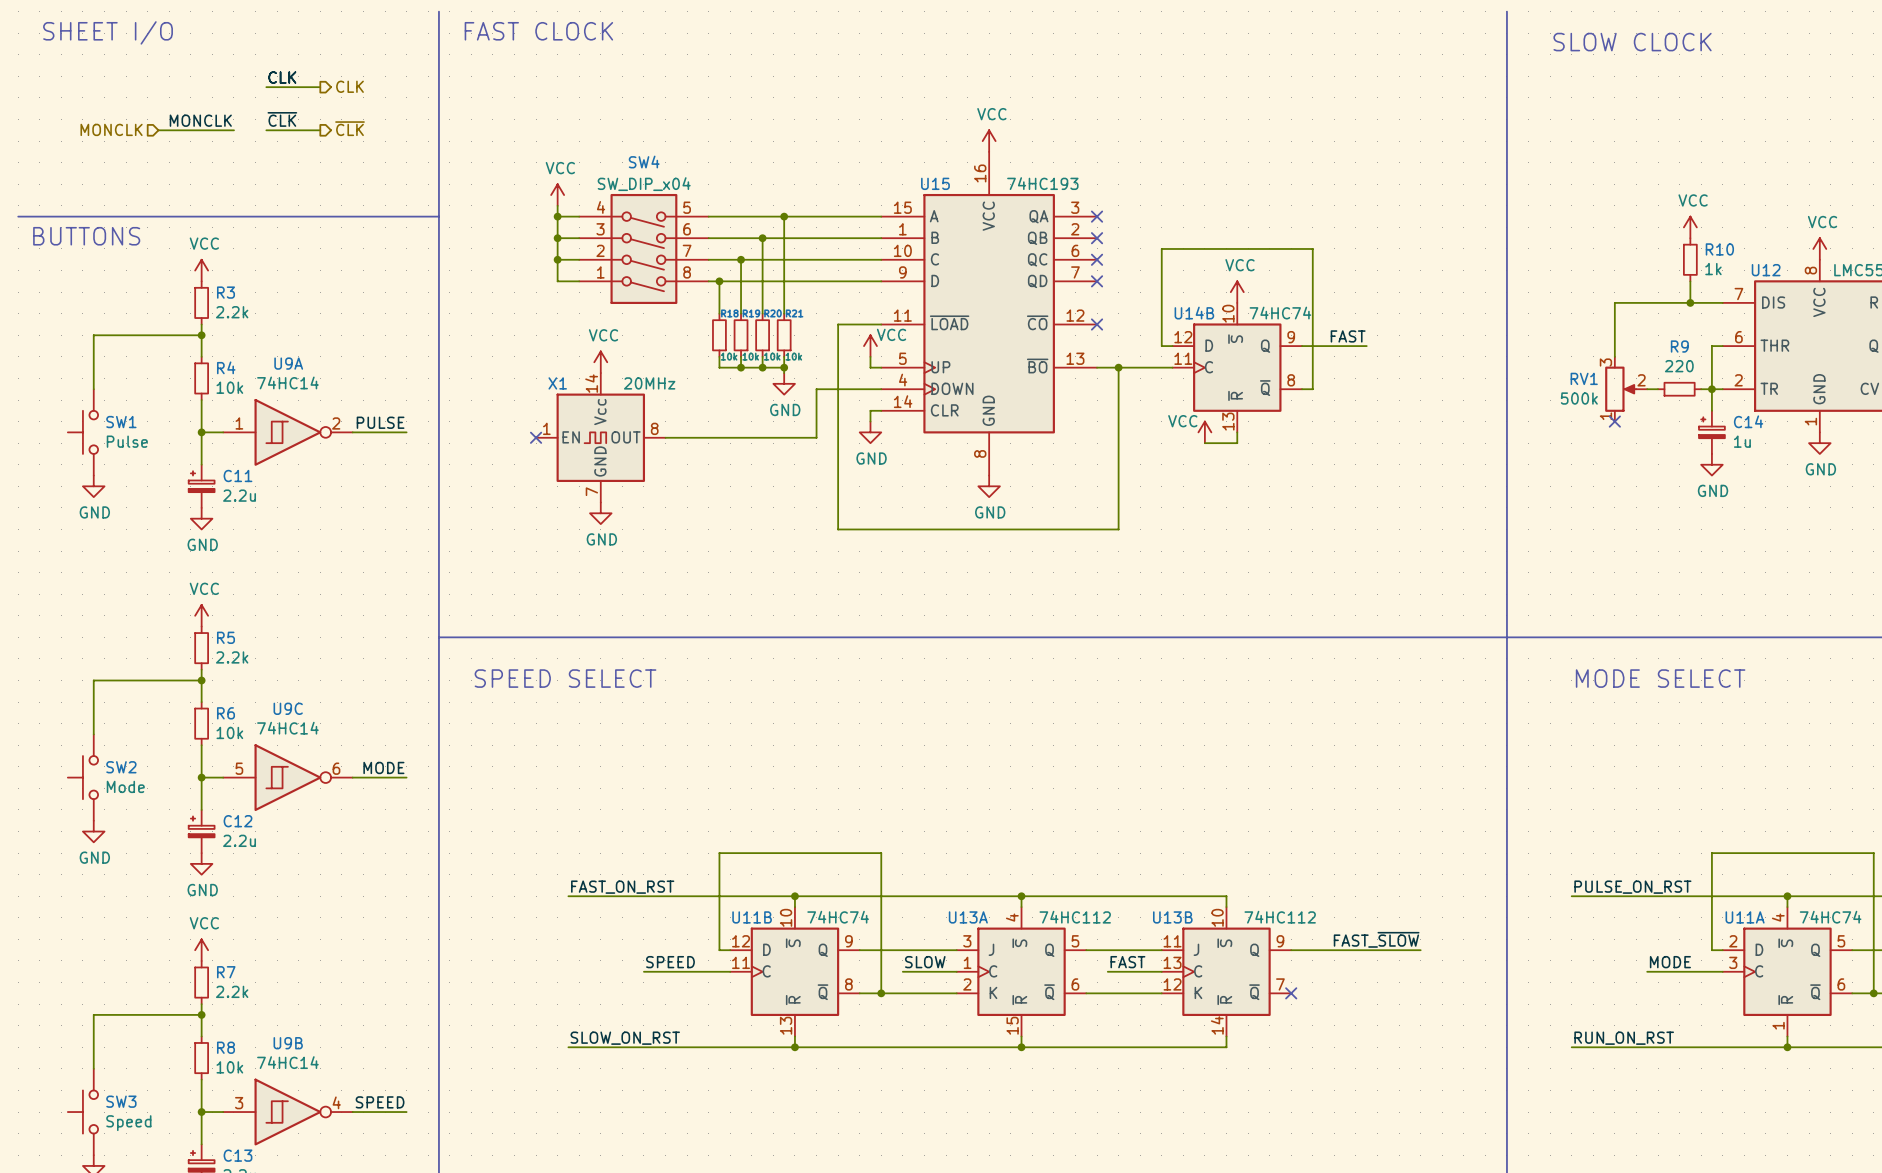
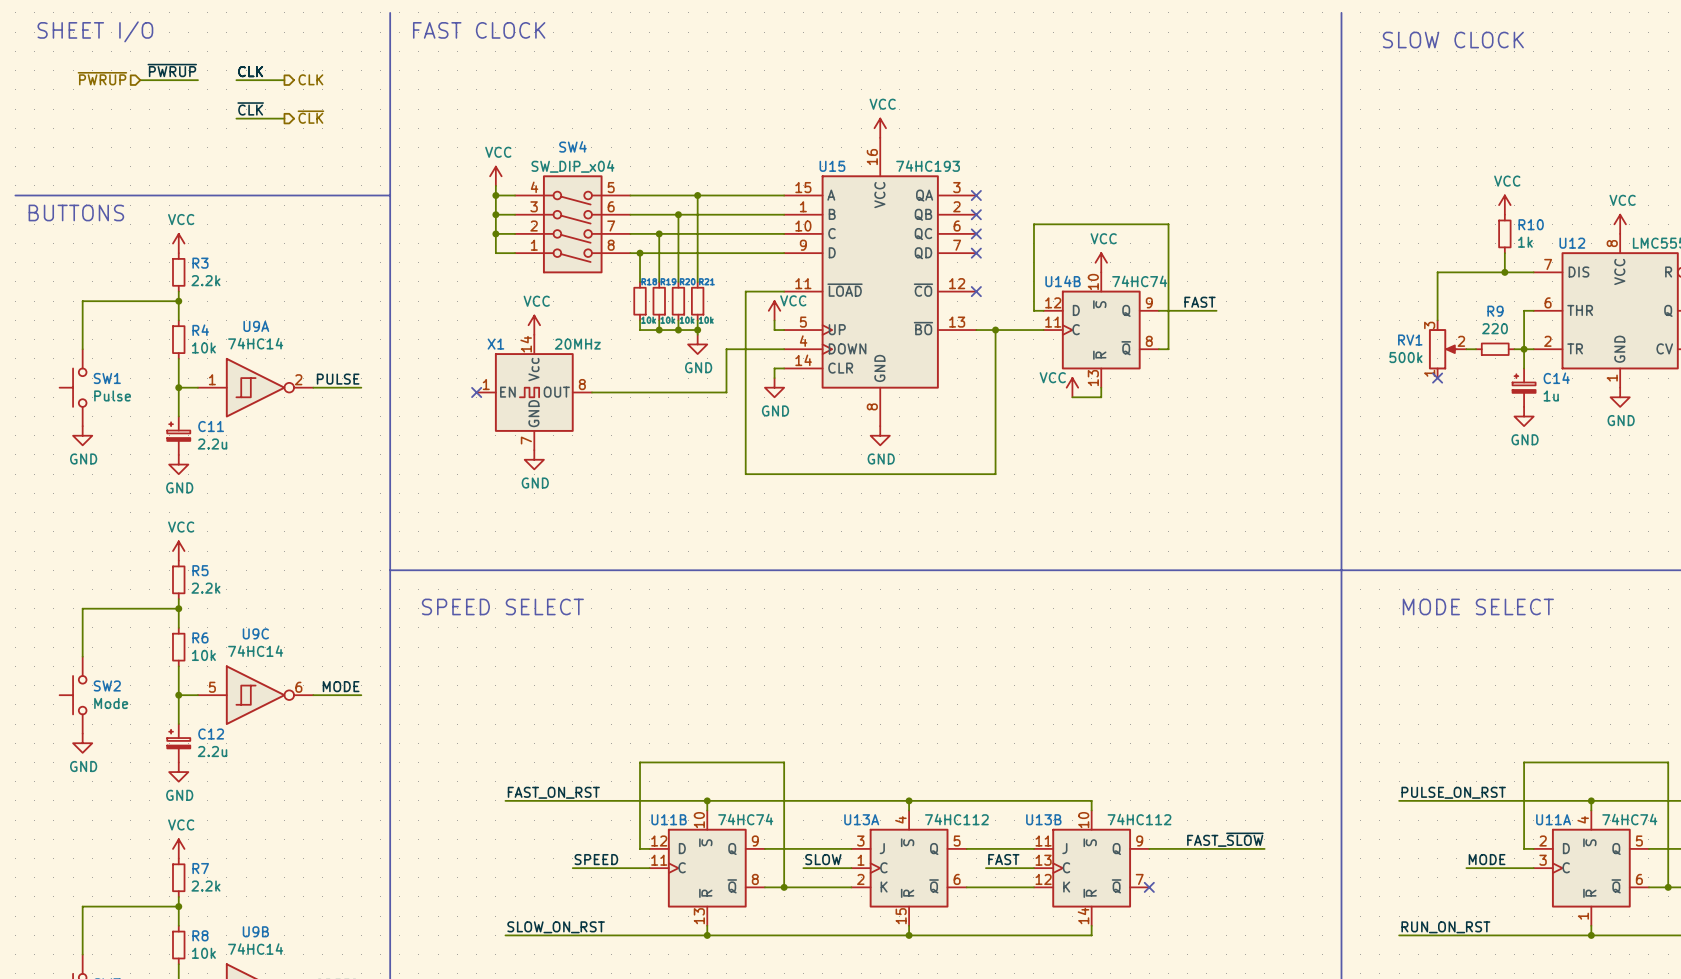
label: none -> ~{PWRUP} (172, 70)
hierarchical label: none -> ~{PWRUP} (102, 78)
wire: none -> (140, 80) (197, 80)
label: MONCLK (200, 120) -> none
hierarchical label: MONCLK (111, 129) -> none
wire: (158, 130) (233, 130) -> none

